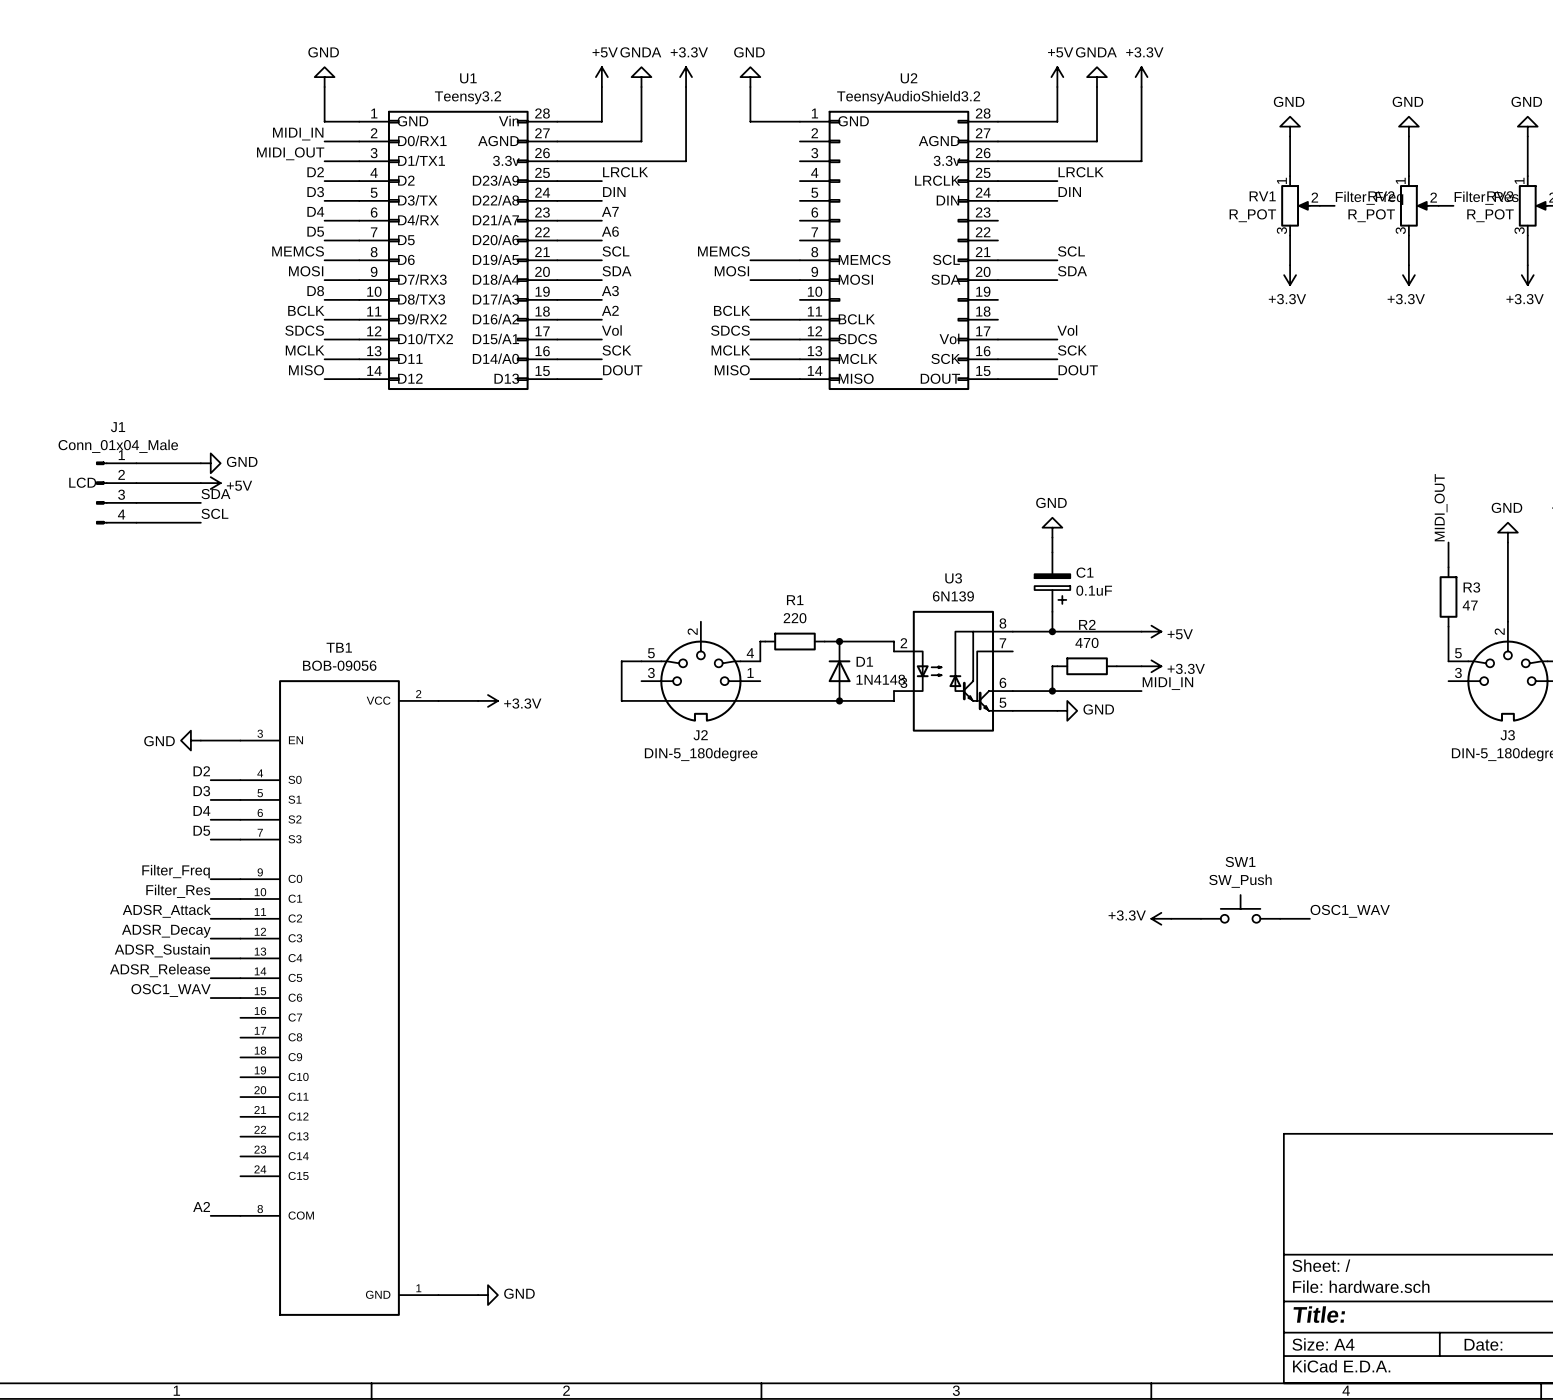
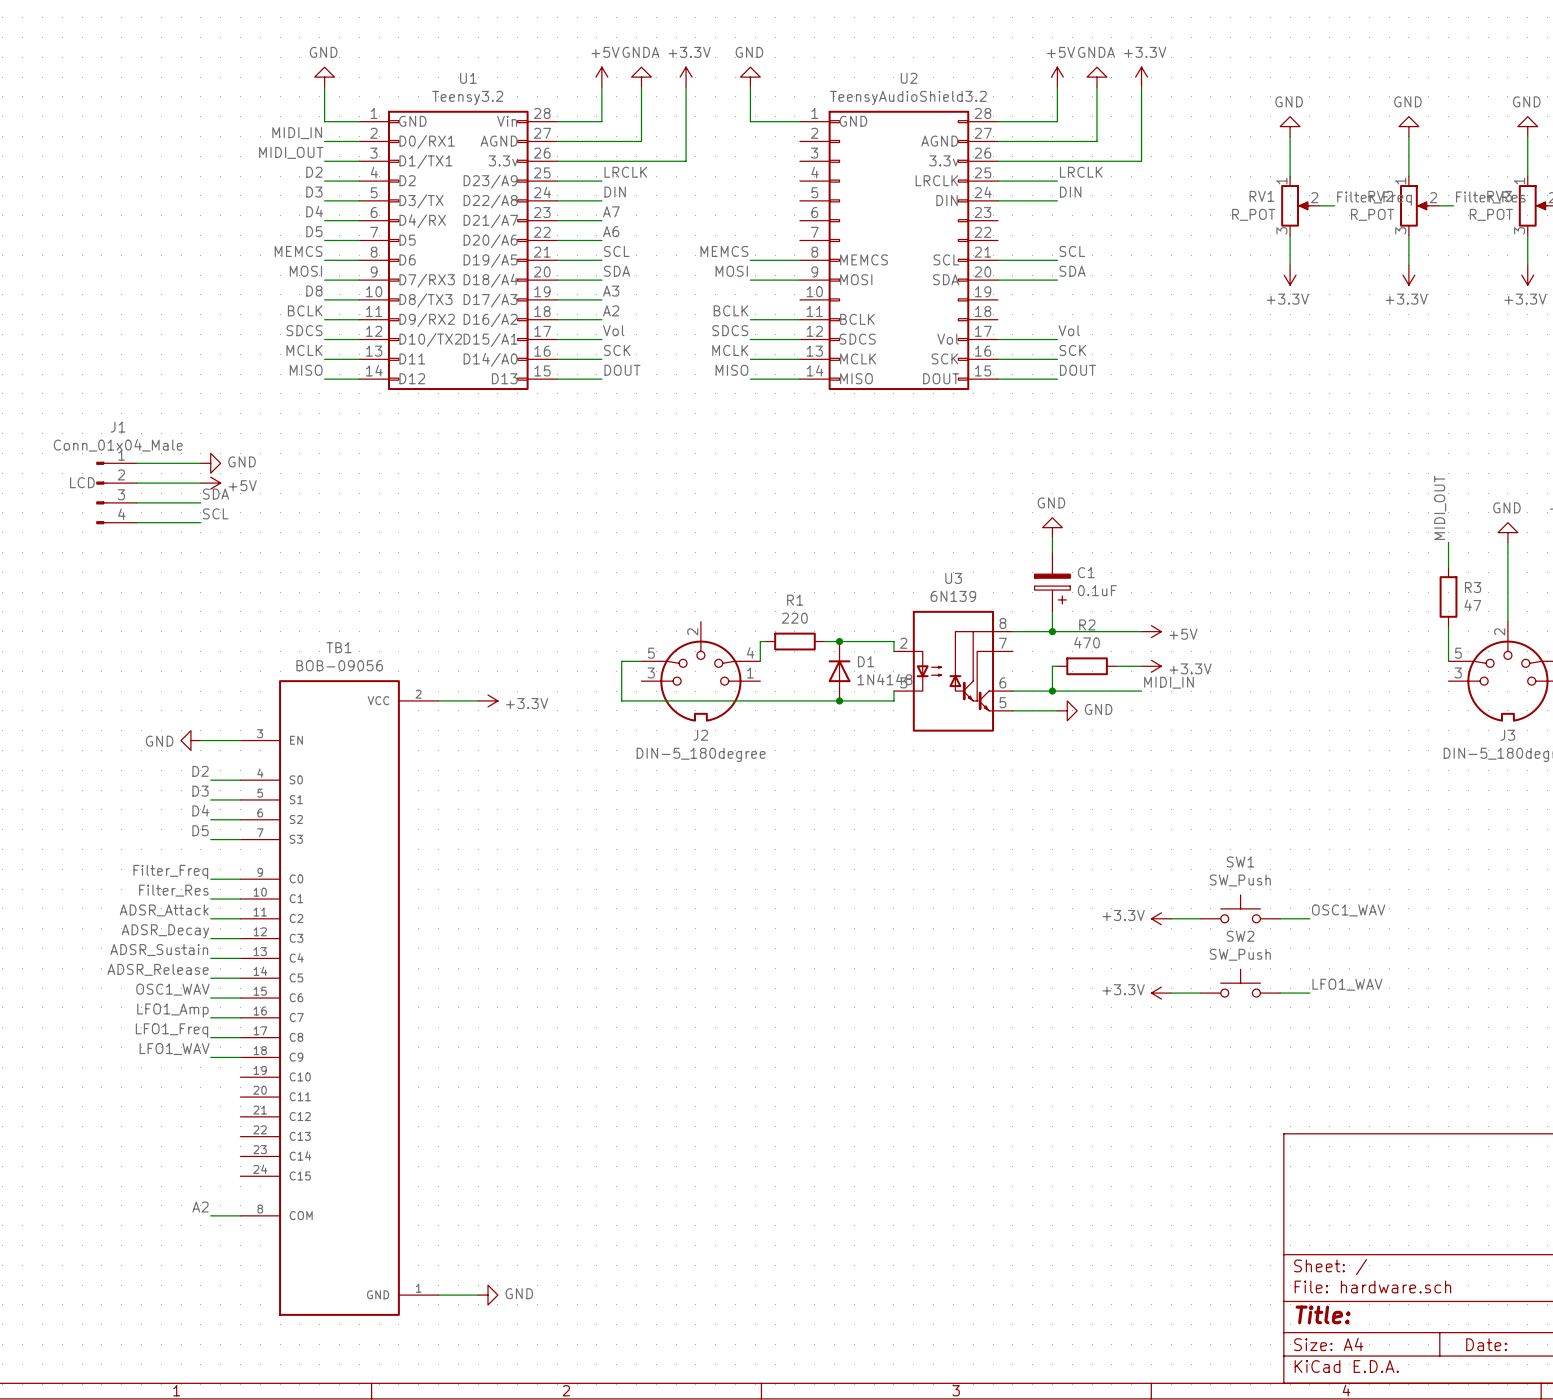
SW2: none -> SW_Push (1240, 983)
label: none -> LFO1_WAV (1347, 984)
power symbol: none -> +3.3V (1161, 993)
wire: none -> (1171, 993) (1200, 993)
wire: none -> (1280, 993) (1309, 993)
label: none -> LFO1_Amp (172, 1010)
wire: none -> (210, 1017) (240, 1017)
label: none -> LFO1_Freq (171, 1030)
wire: none -> (210, 1037) (240, 1037)
label: none -> LFO1_WAV (174, 1049)
wire: none -> (210, 1057) (240, 1057)

